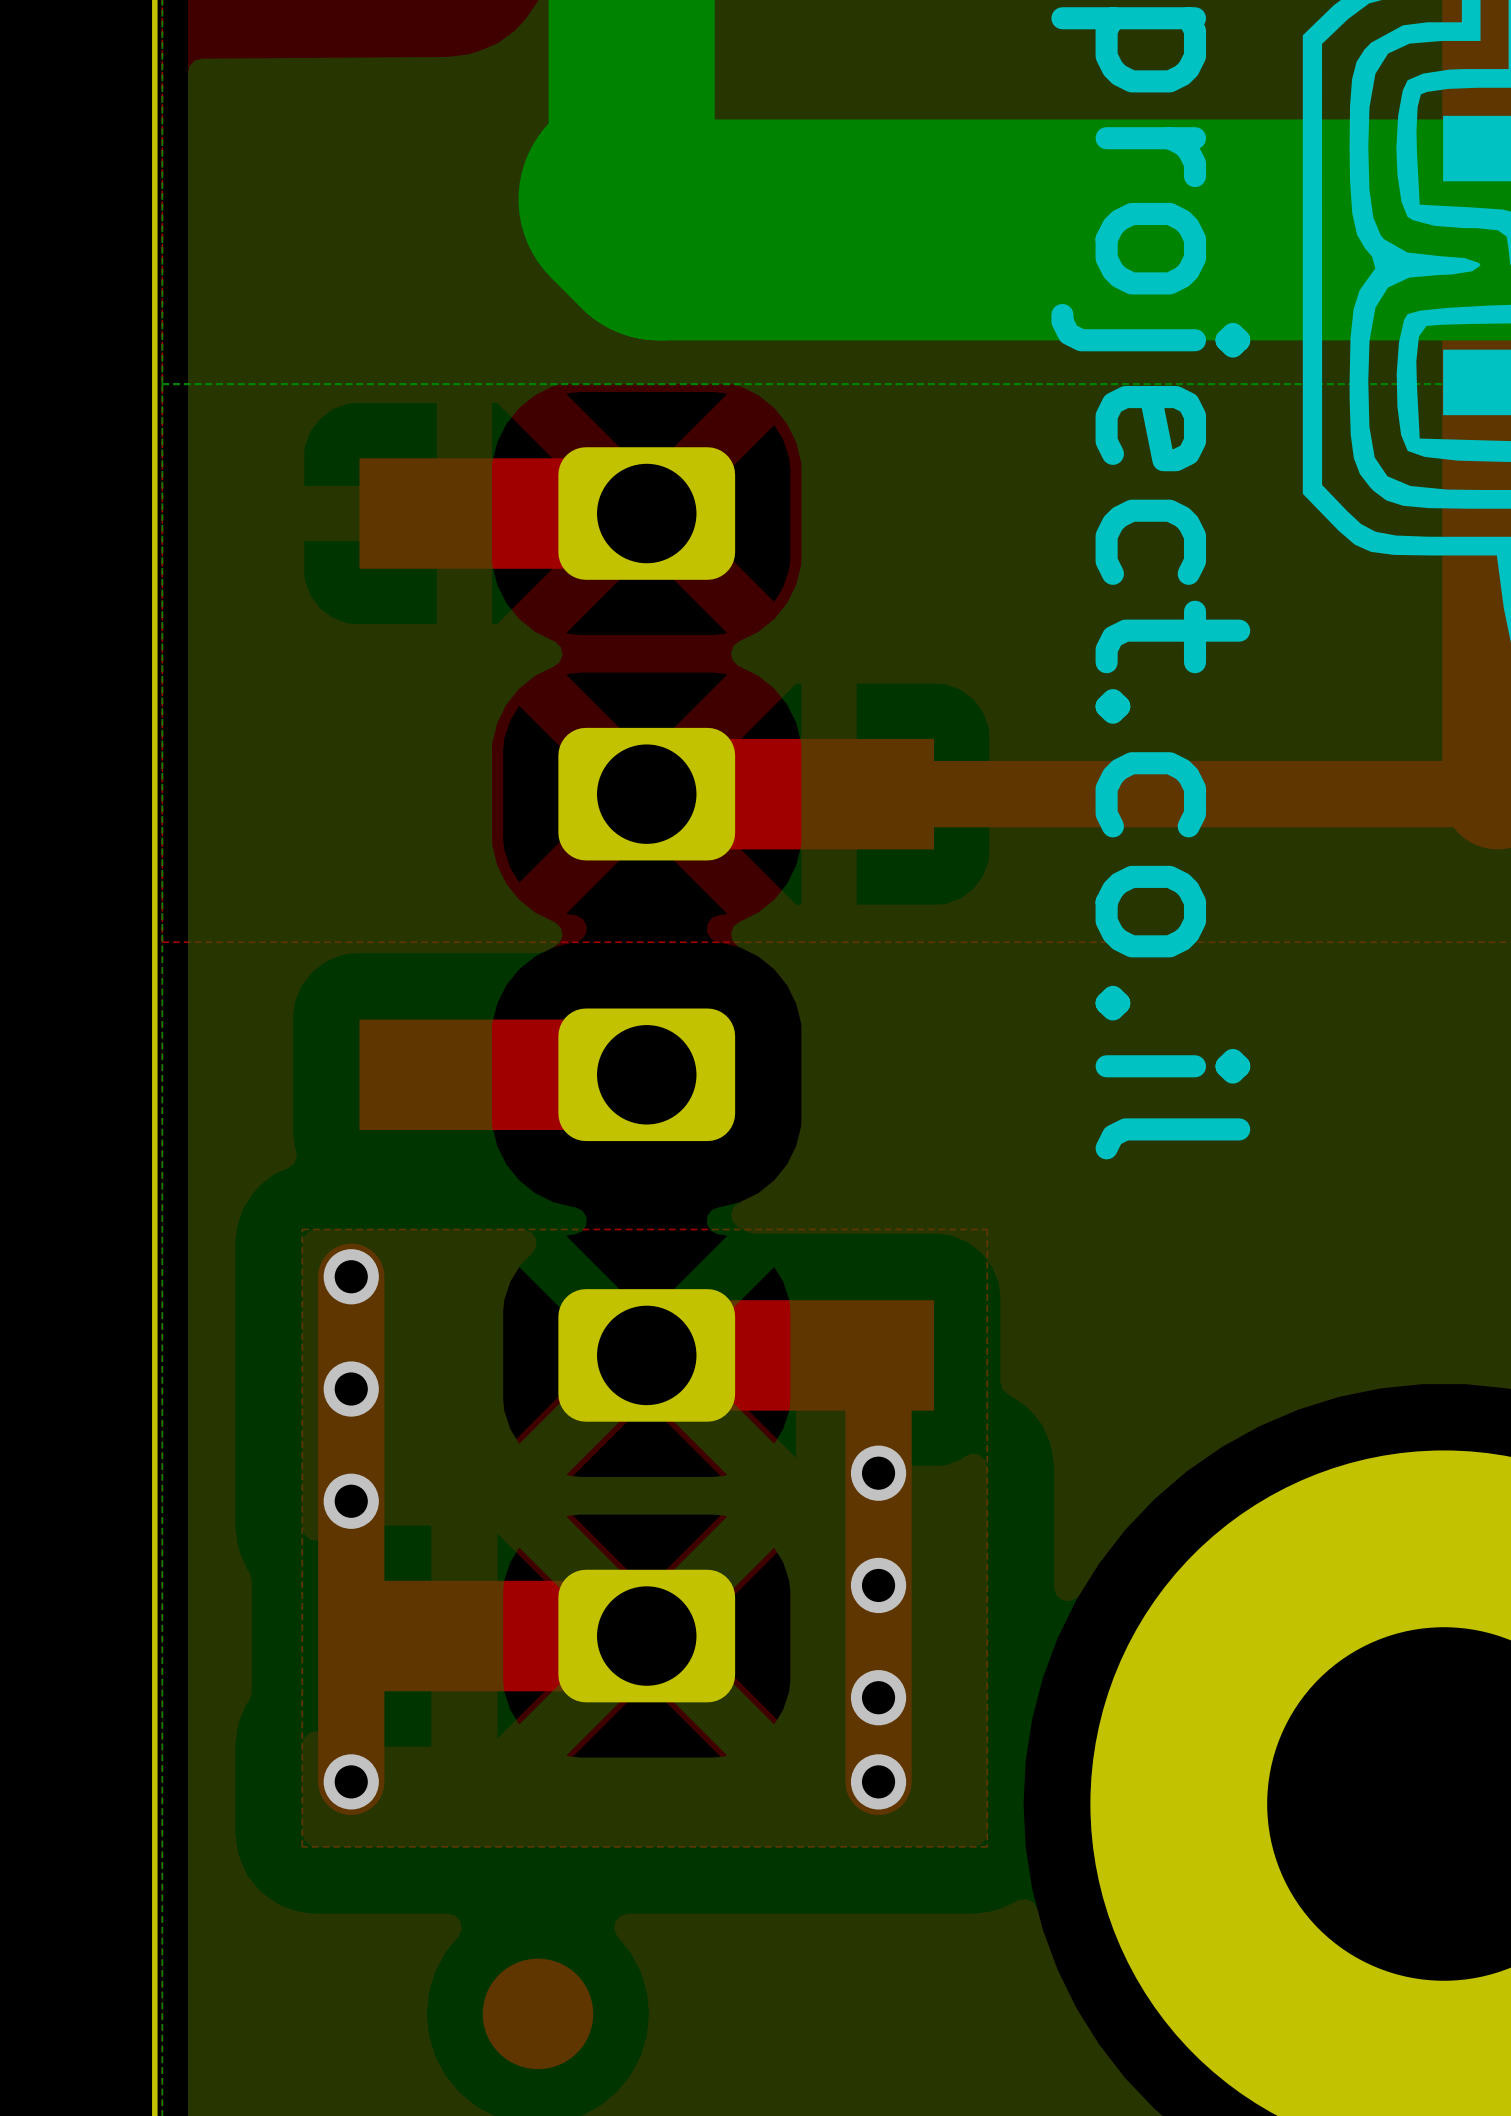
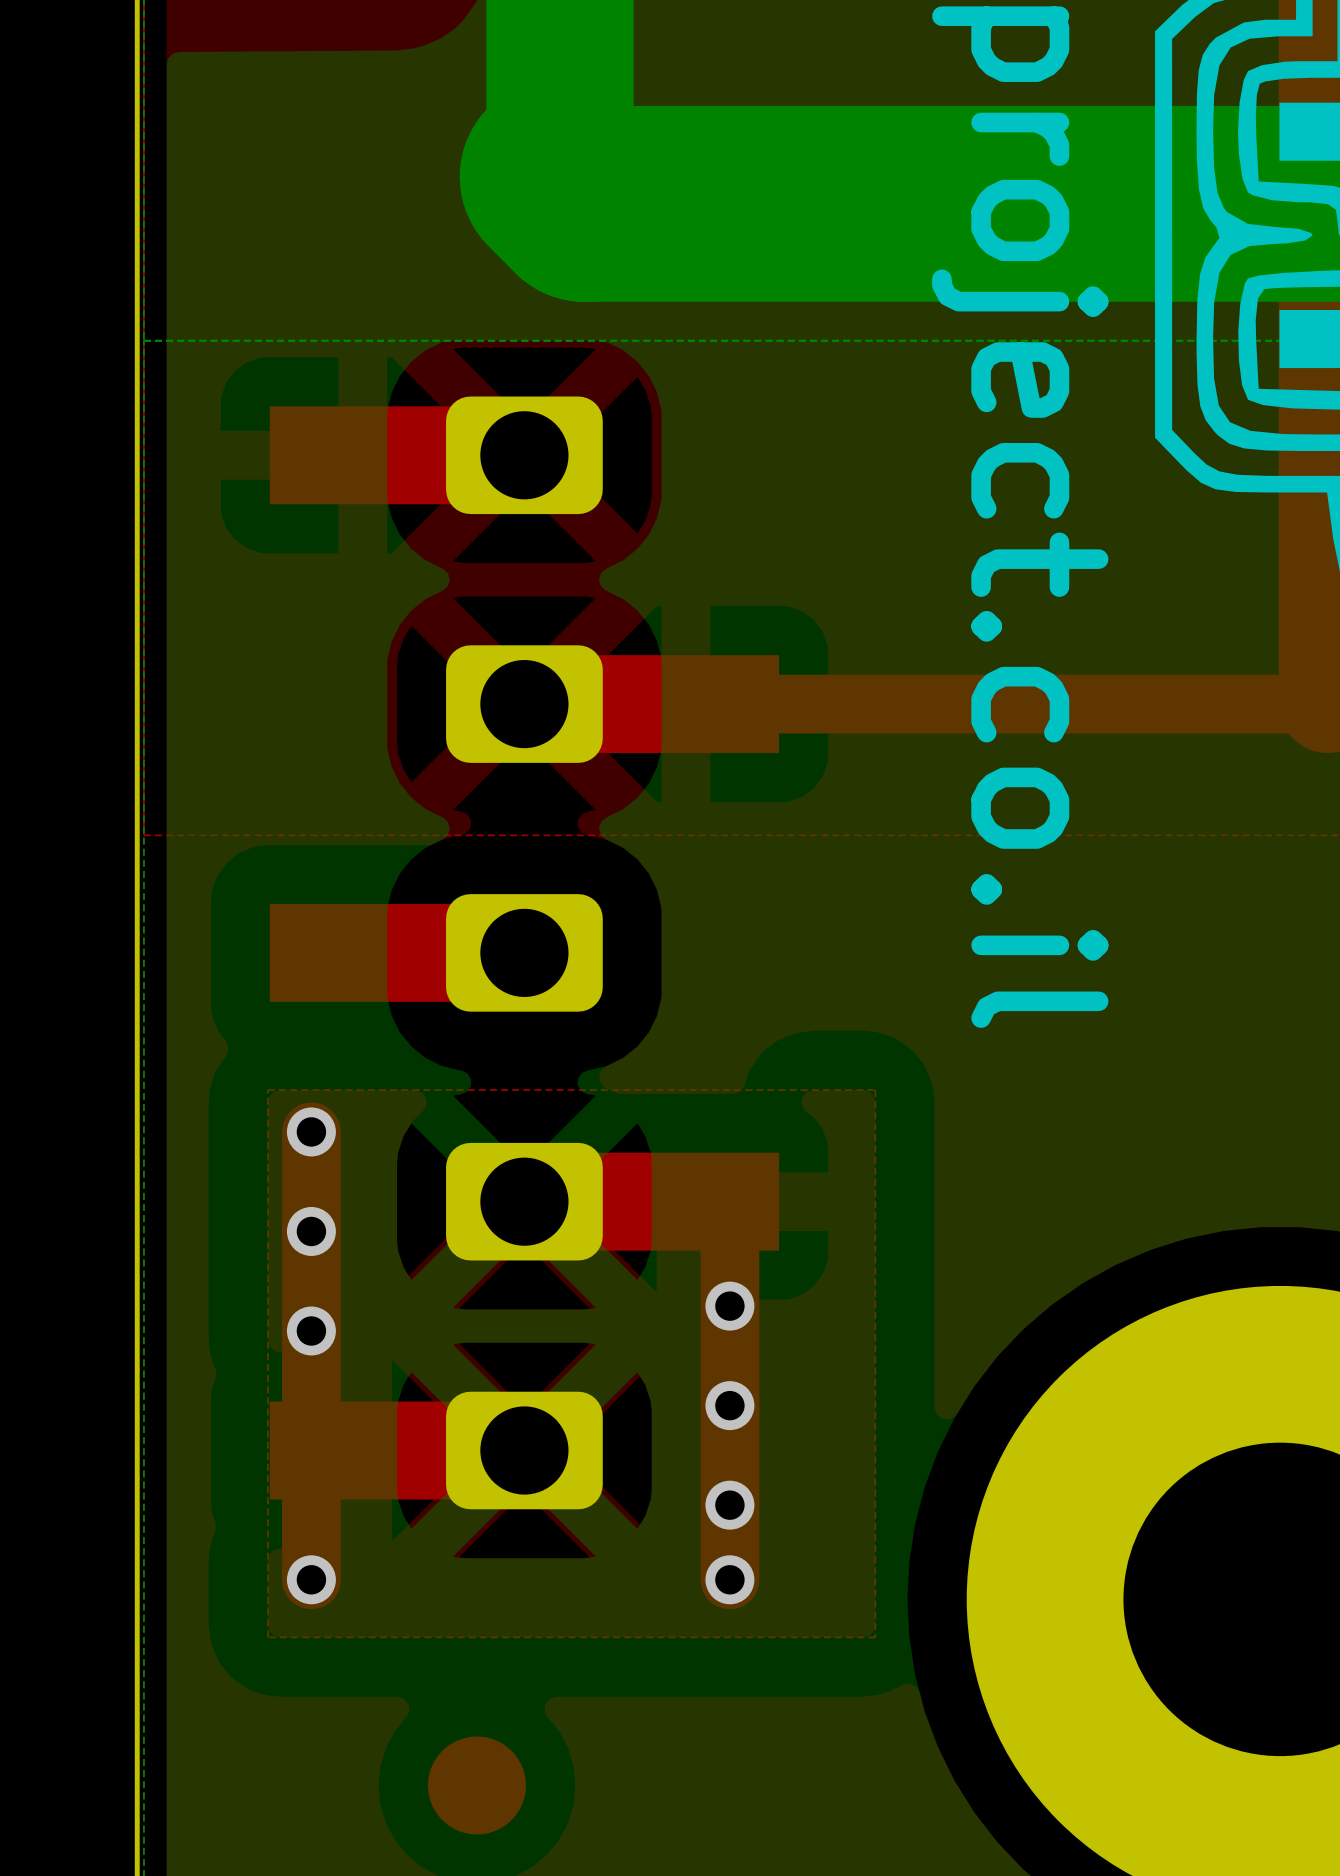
part position: (646, 1074) -> (524, 952)
top track: (831, 1347) (878, 1394) (878, 1781) -> none
top track: none -> (729, 1236) (729, 1579)
via position: (878, 1473) -> (729, 1306)
via position: (878, 1585) -> (729, 1405)
via position: (878, 1697) -> (729, 1505)
via position: (878, 1781) -> (729, 1579)

